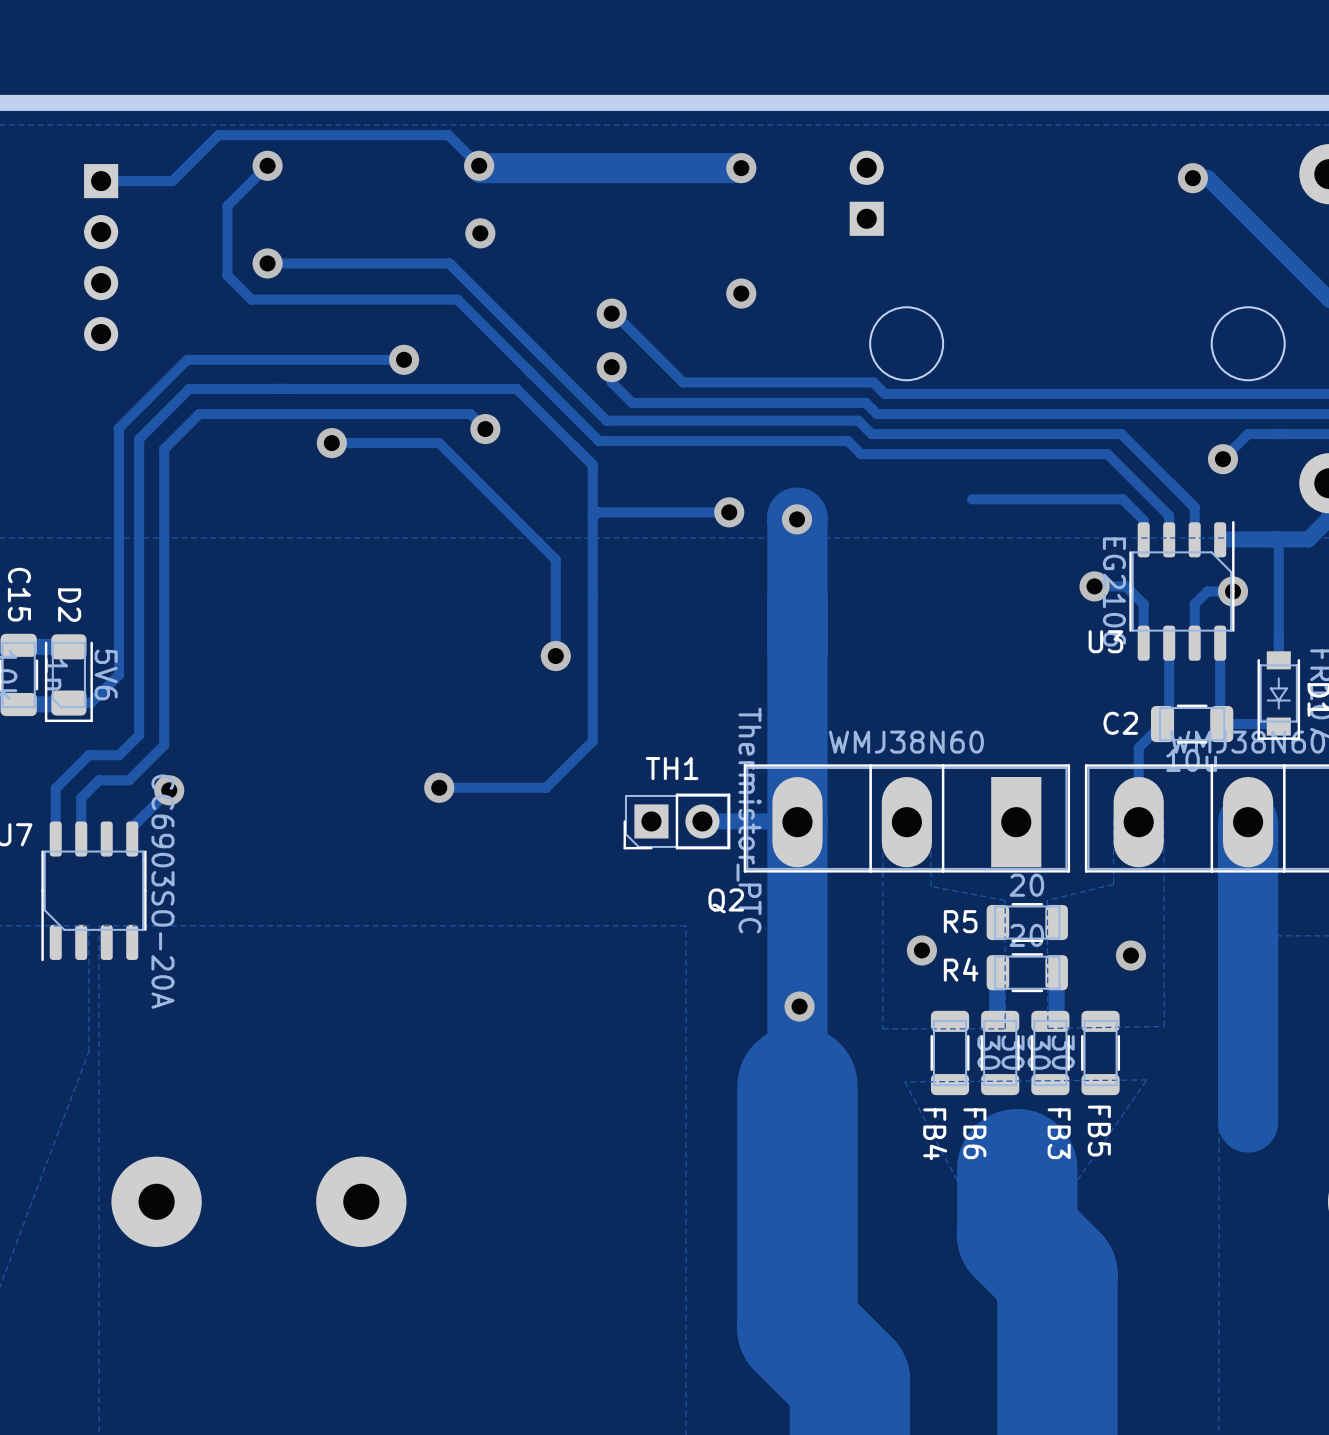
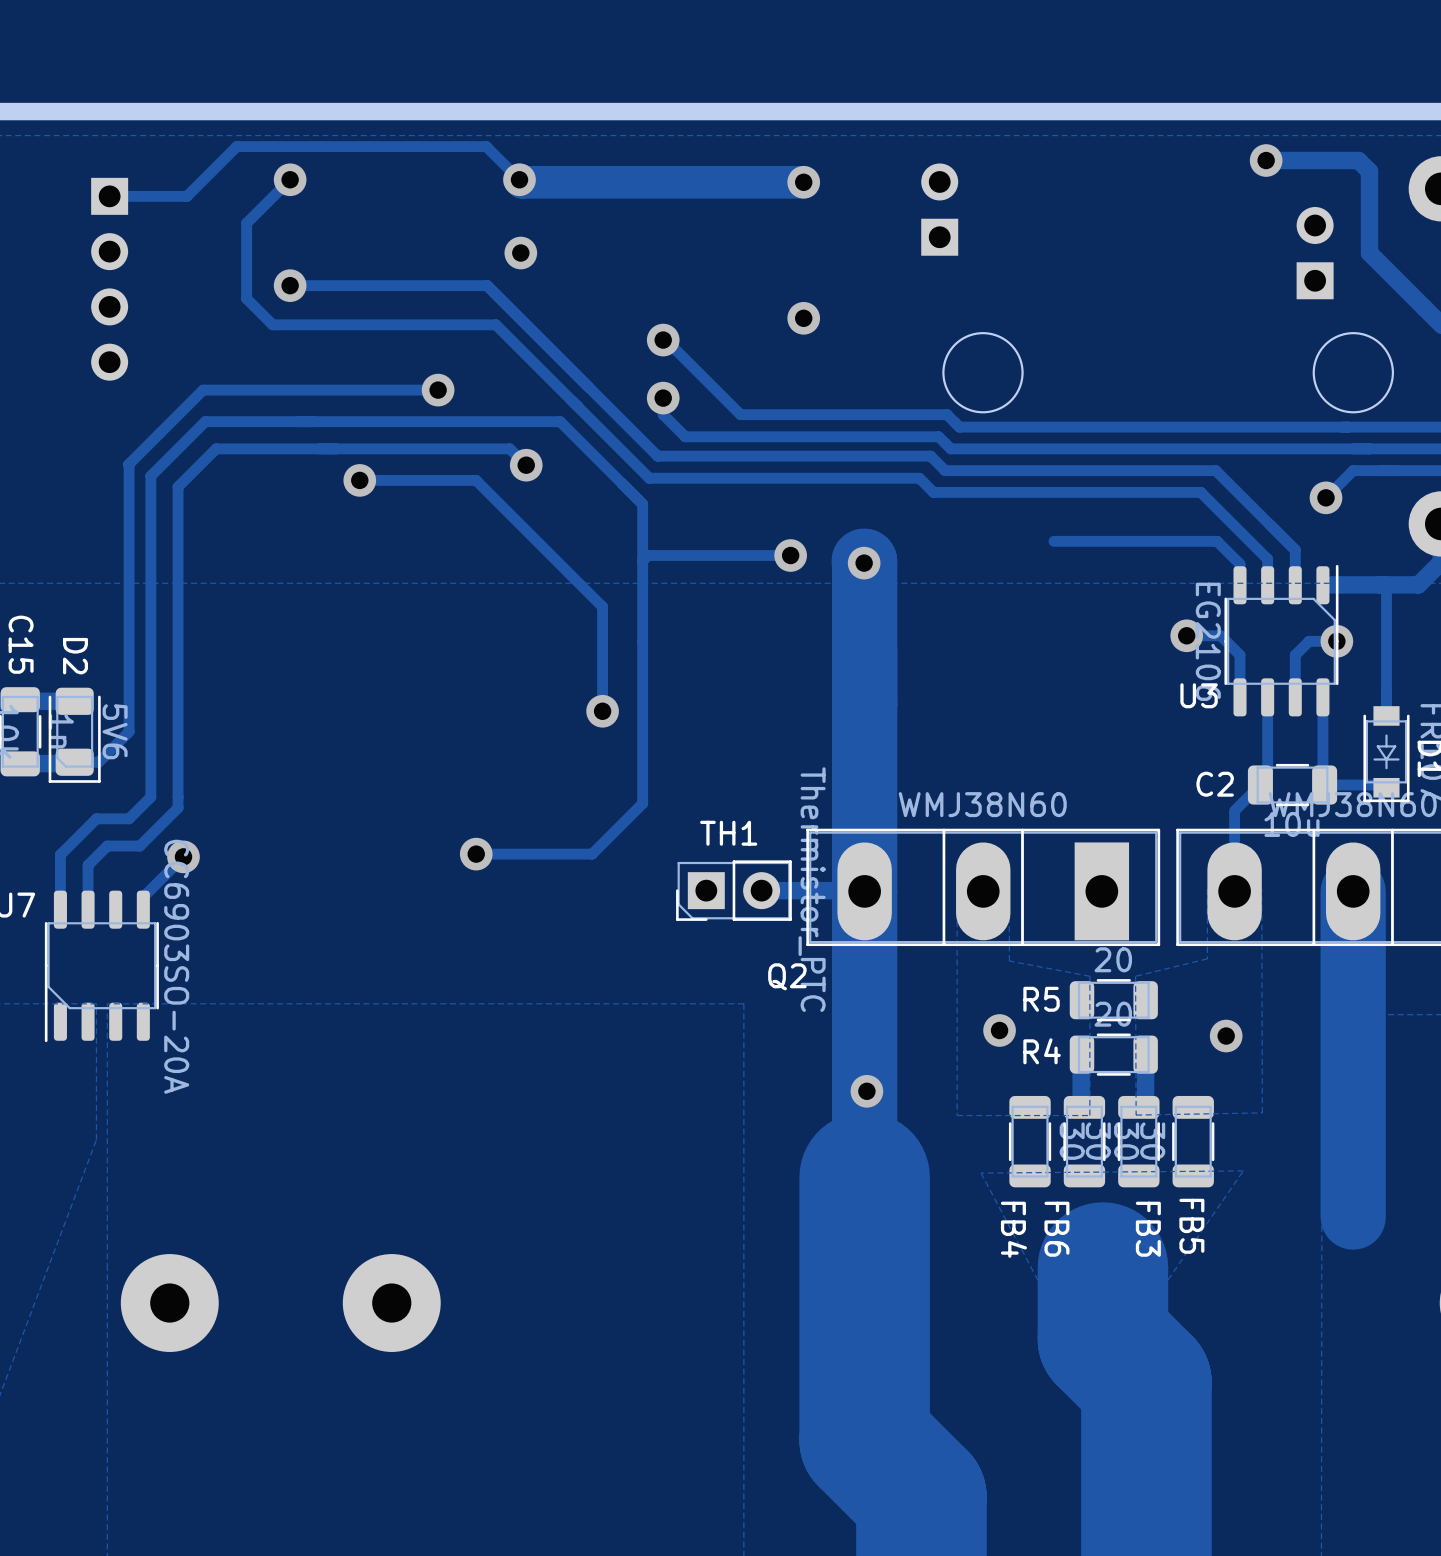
track: (1192, 178) (1207, 178) (1263, 233) -> (1266, 160) (1358, 160) (1369, 171) (1369, 253)
via position: (1192, 178) -> (1266, 160)
part: none -> (1315, 253)

